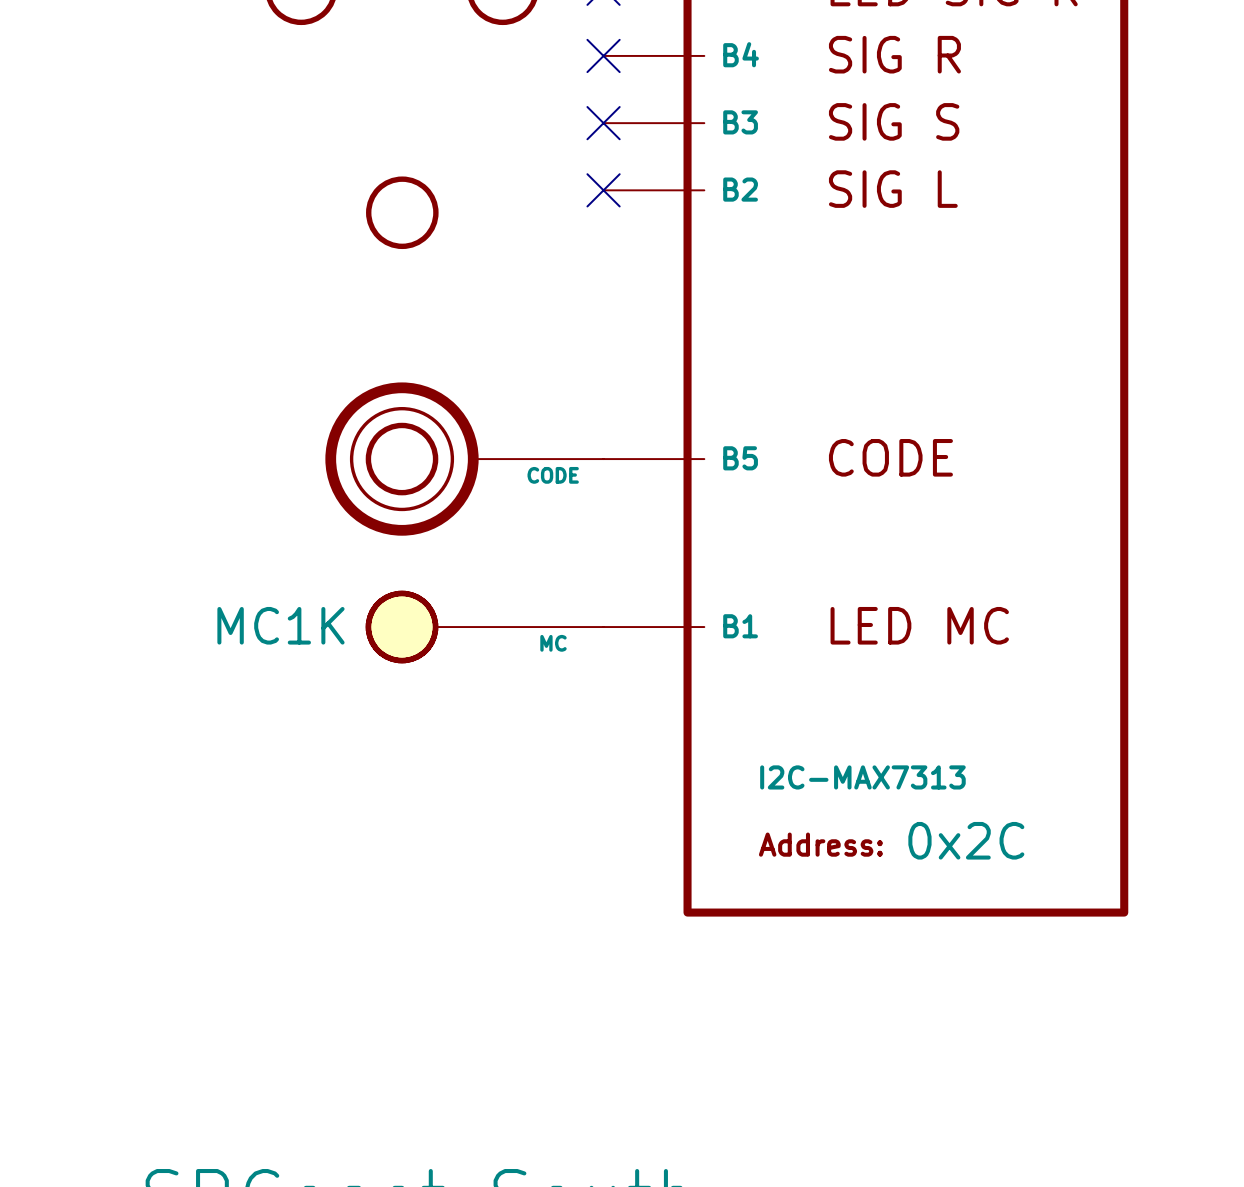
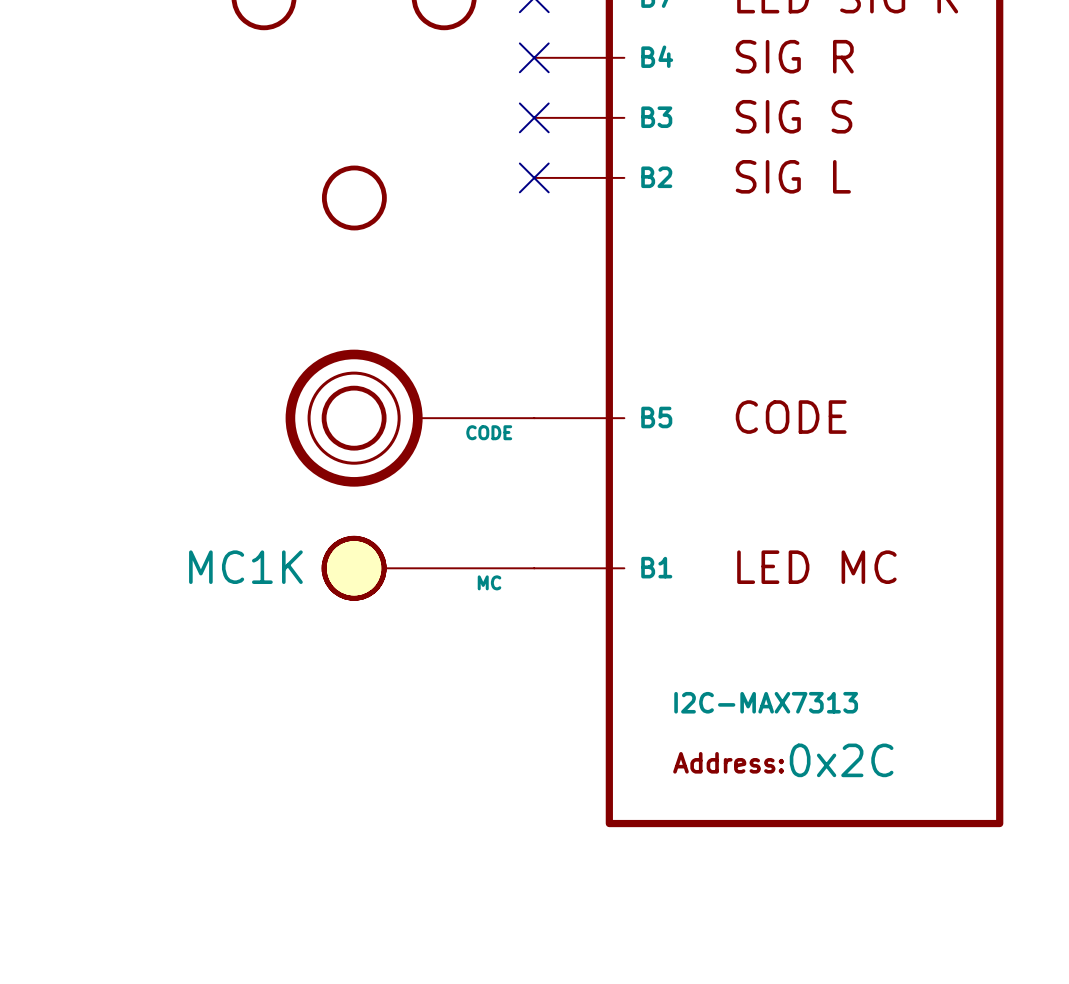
part text position: 0x2C (966, 840) -> 0x2C (841, 760)

